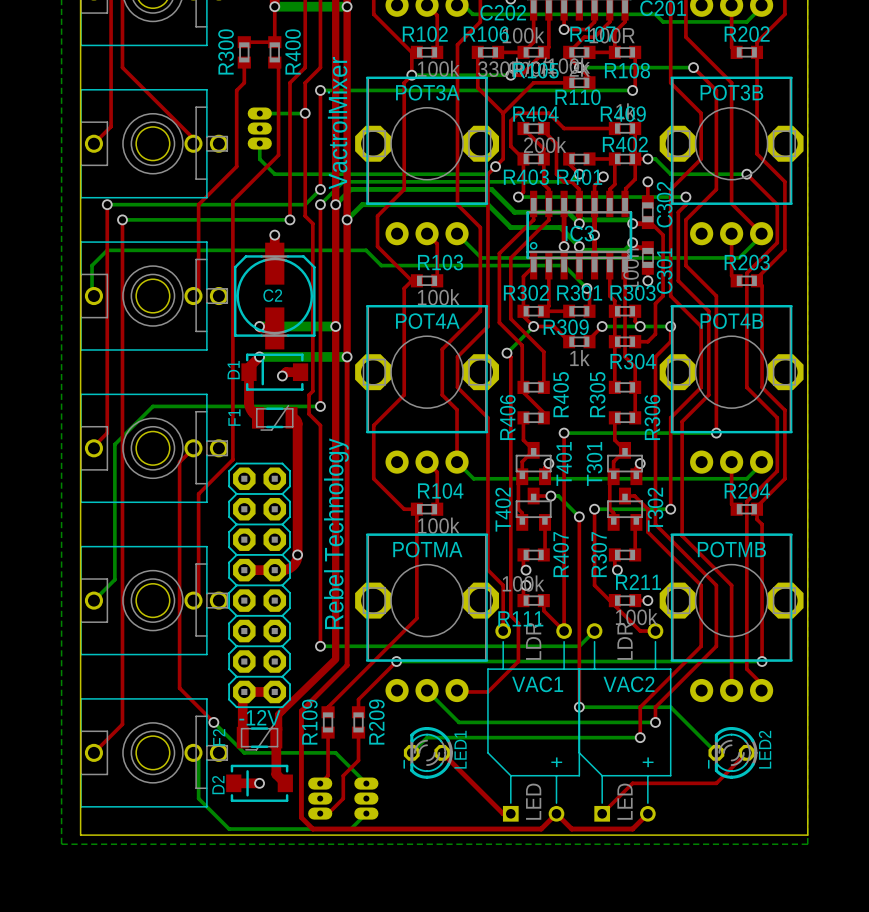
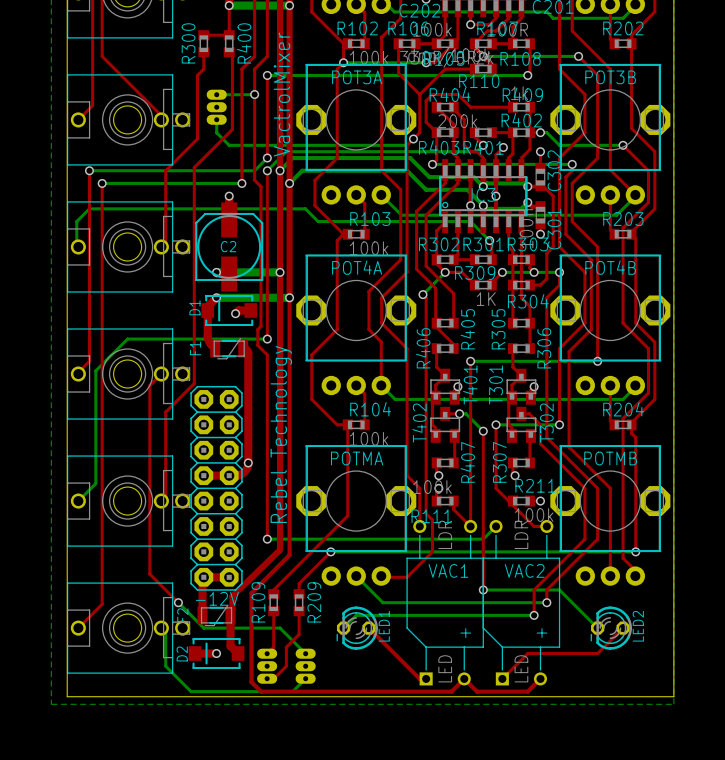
R309 value: 1k (579, 358) -> 1K (486, 299)

